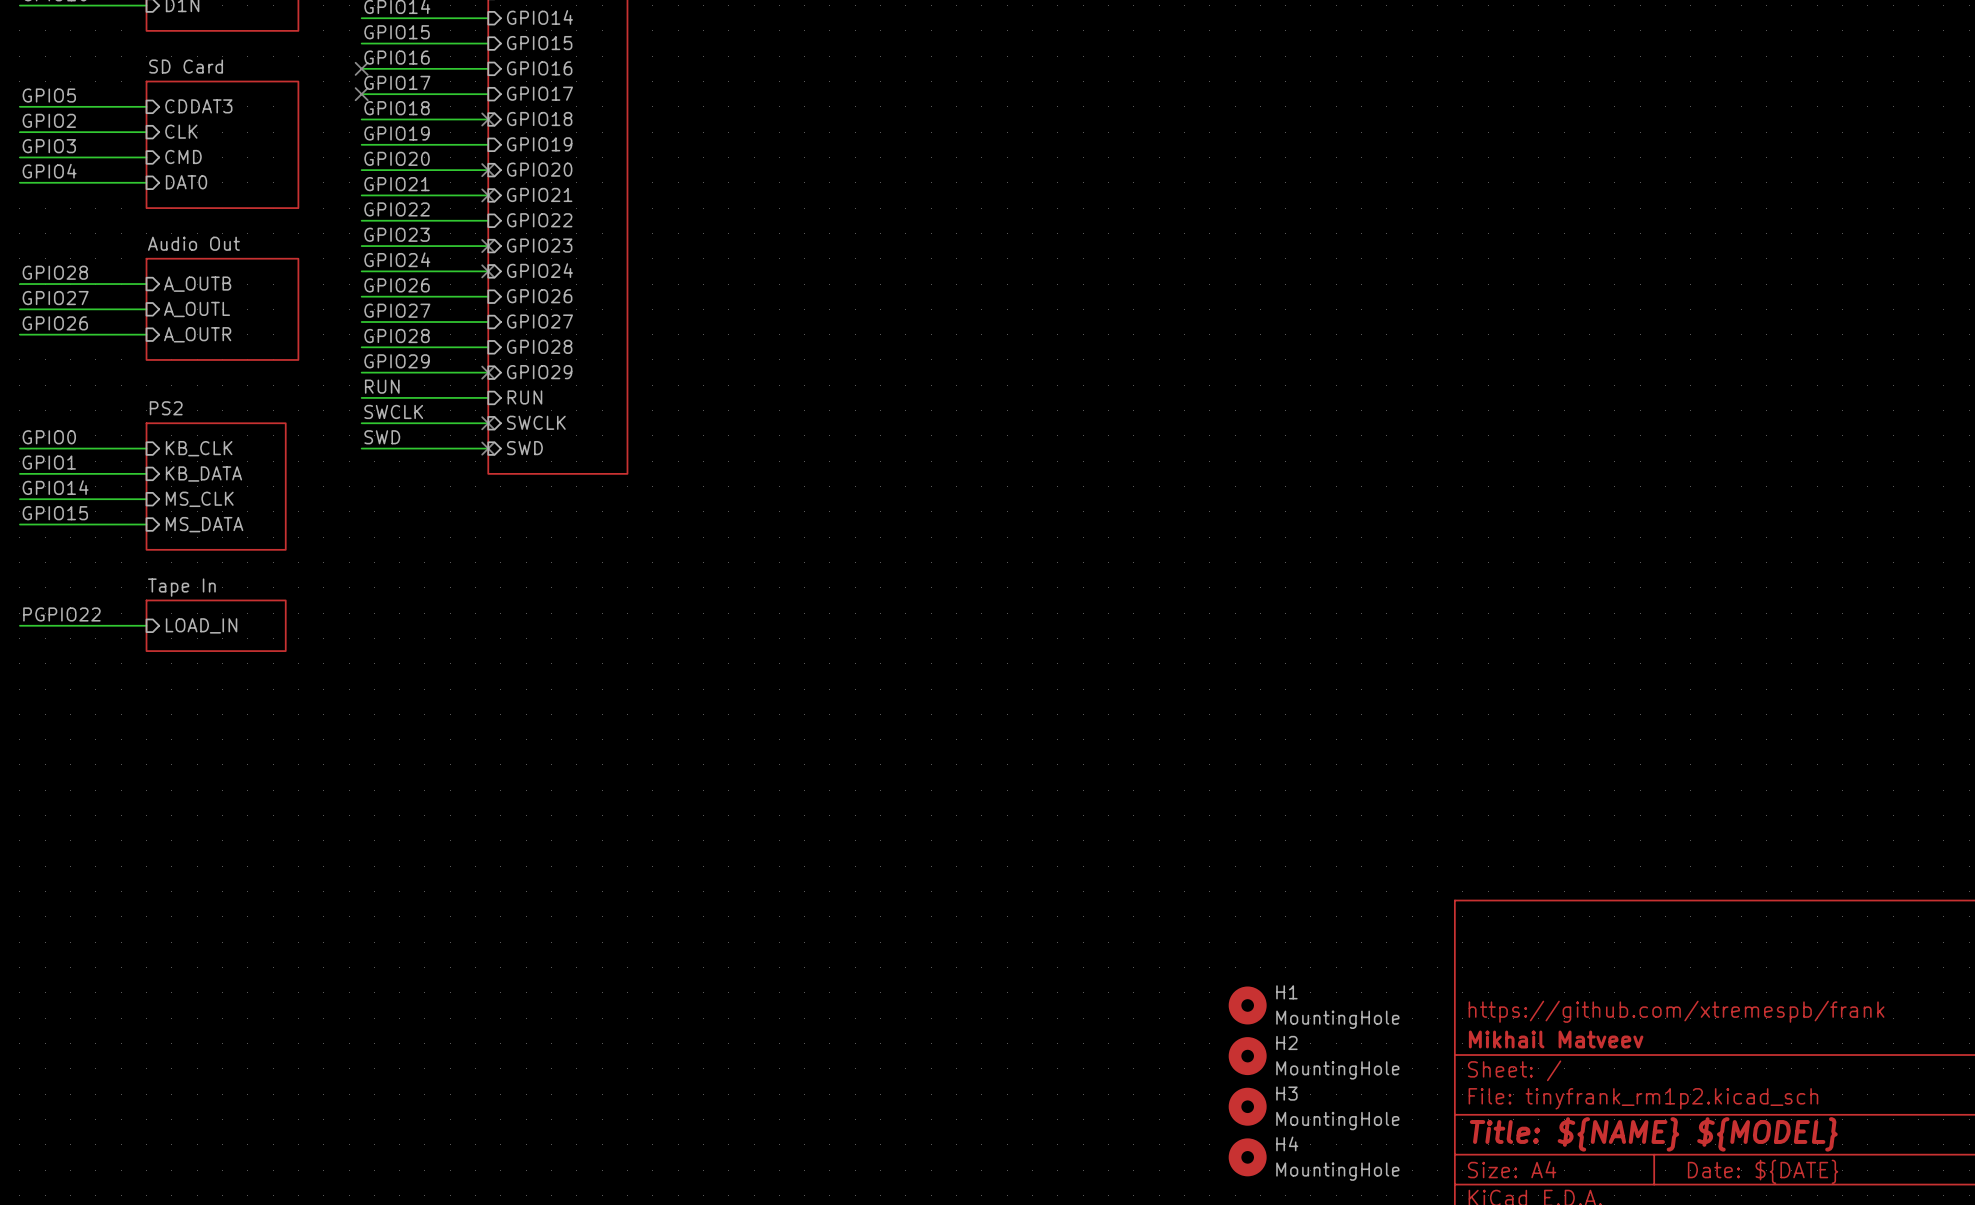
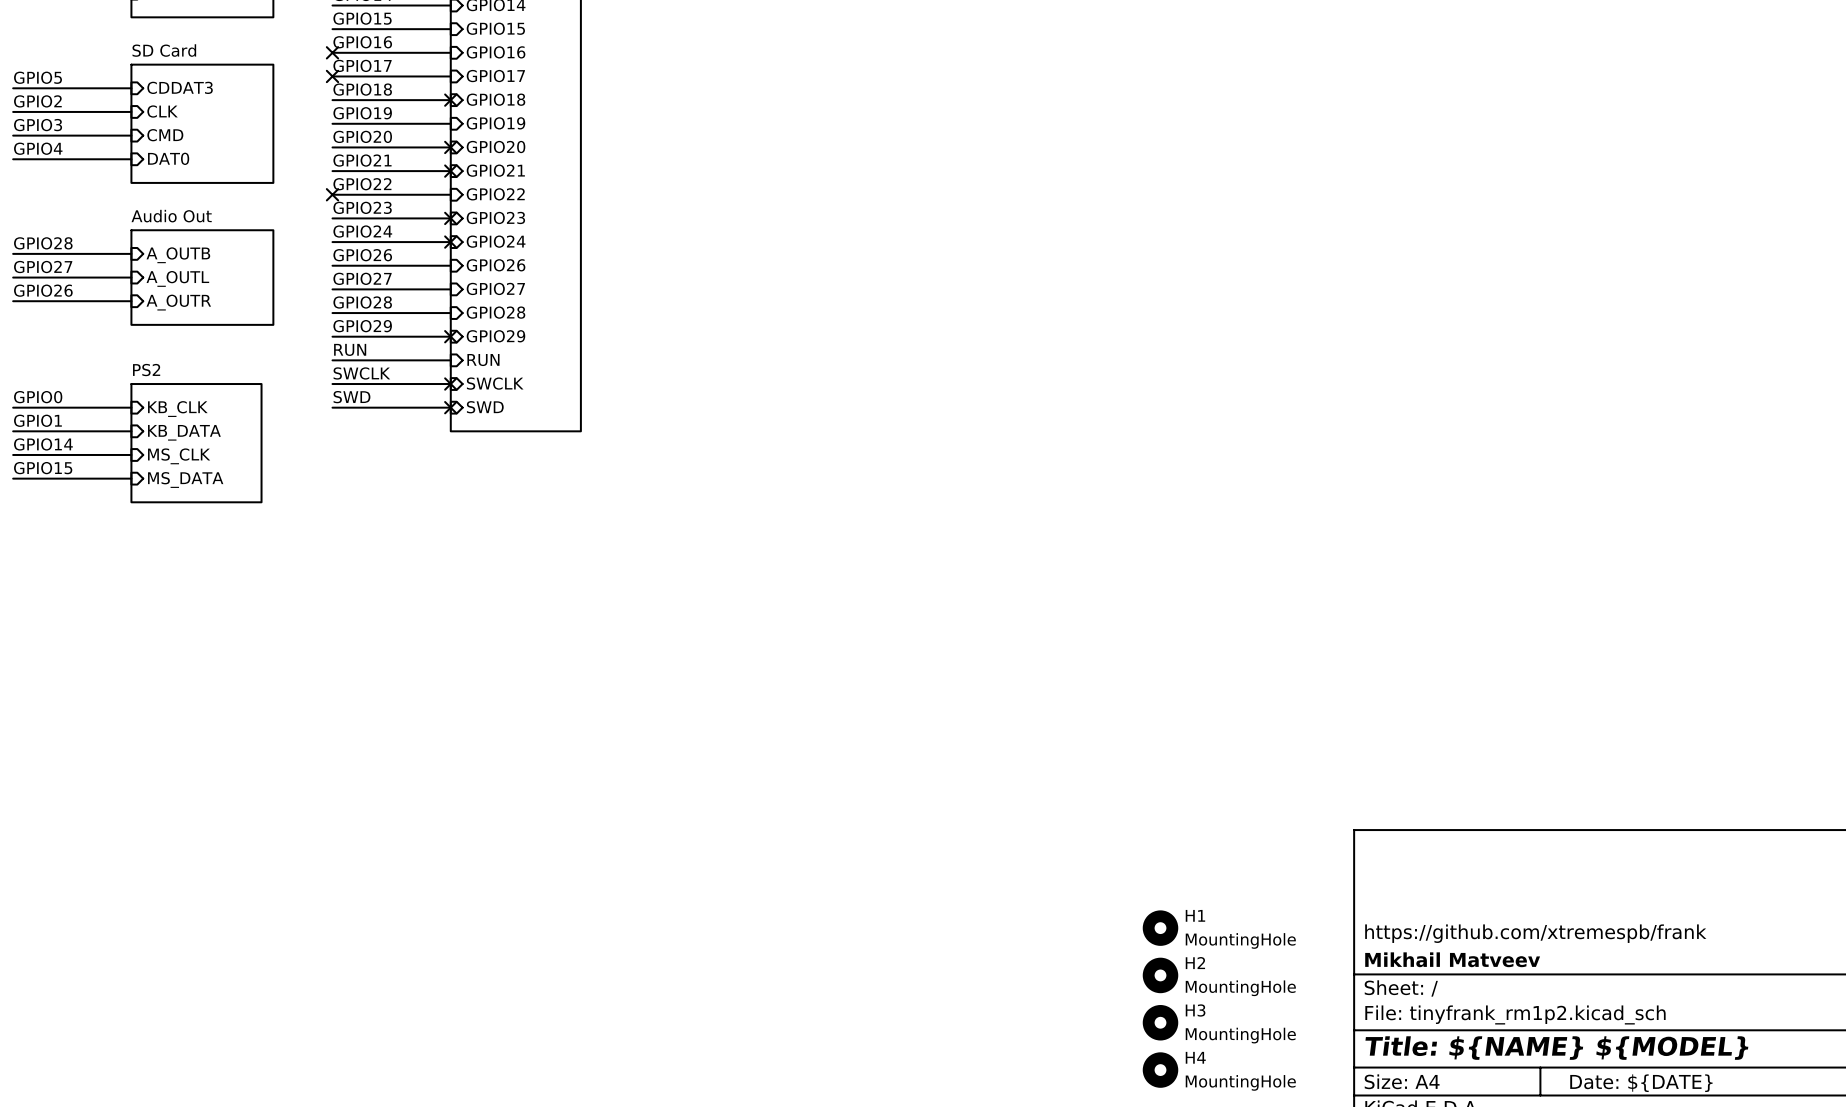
no-connect mark: none -> (332, 194)
label: PGPIO22 (61, 614) -> none
wire: (19, 625) (146, 625) -> none
sheet pin: LOAD_IN (201, 625) -> none
sheet Tape In: (216, 625) -> none

